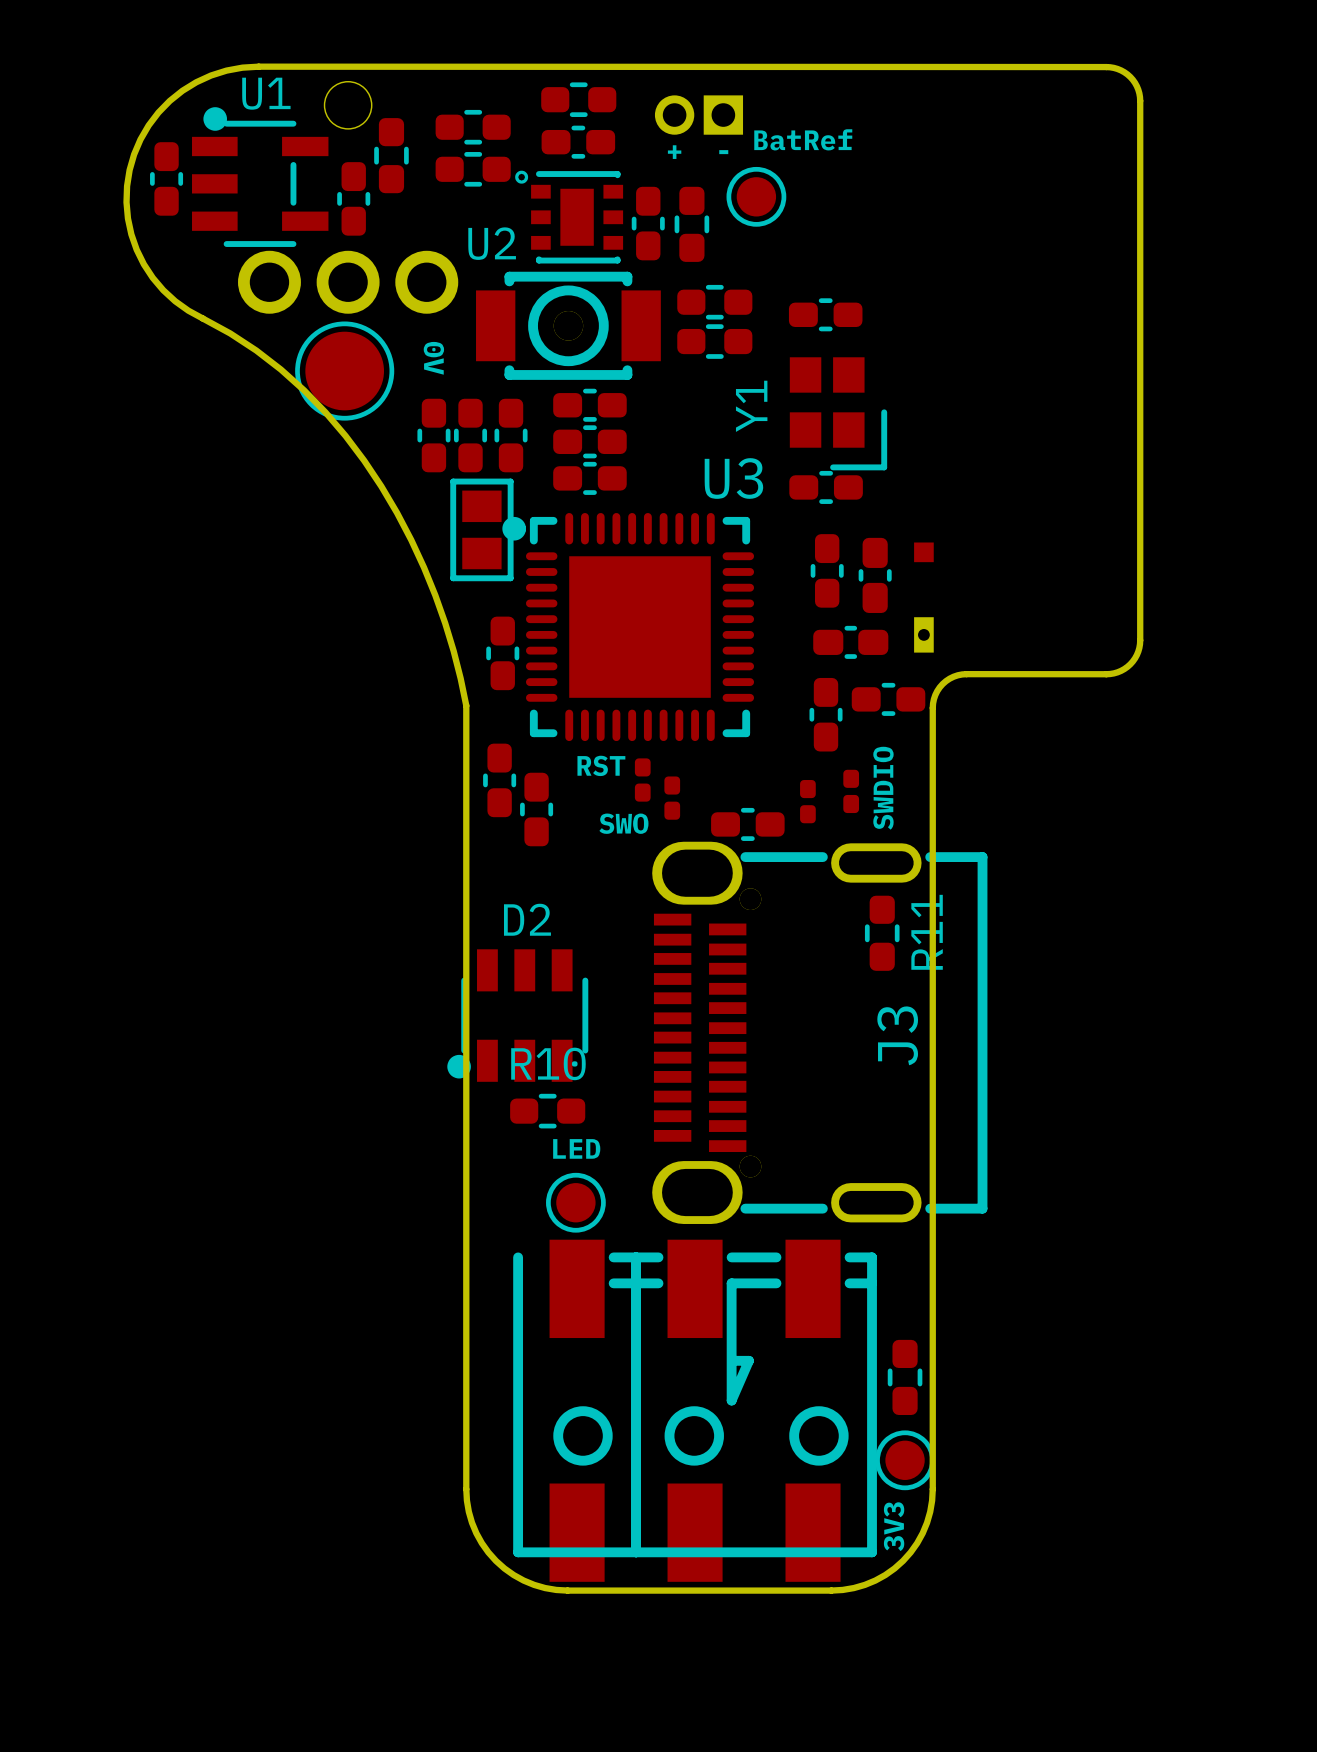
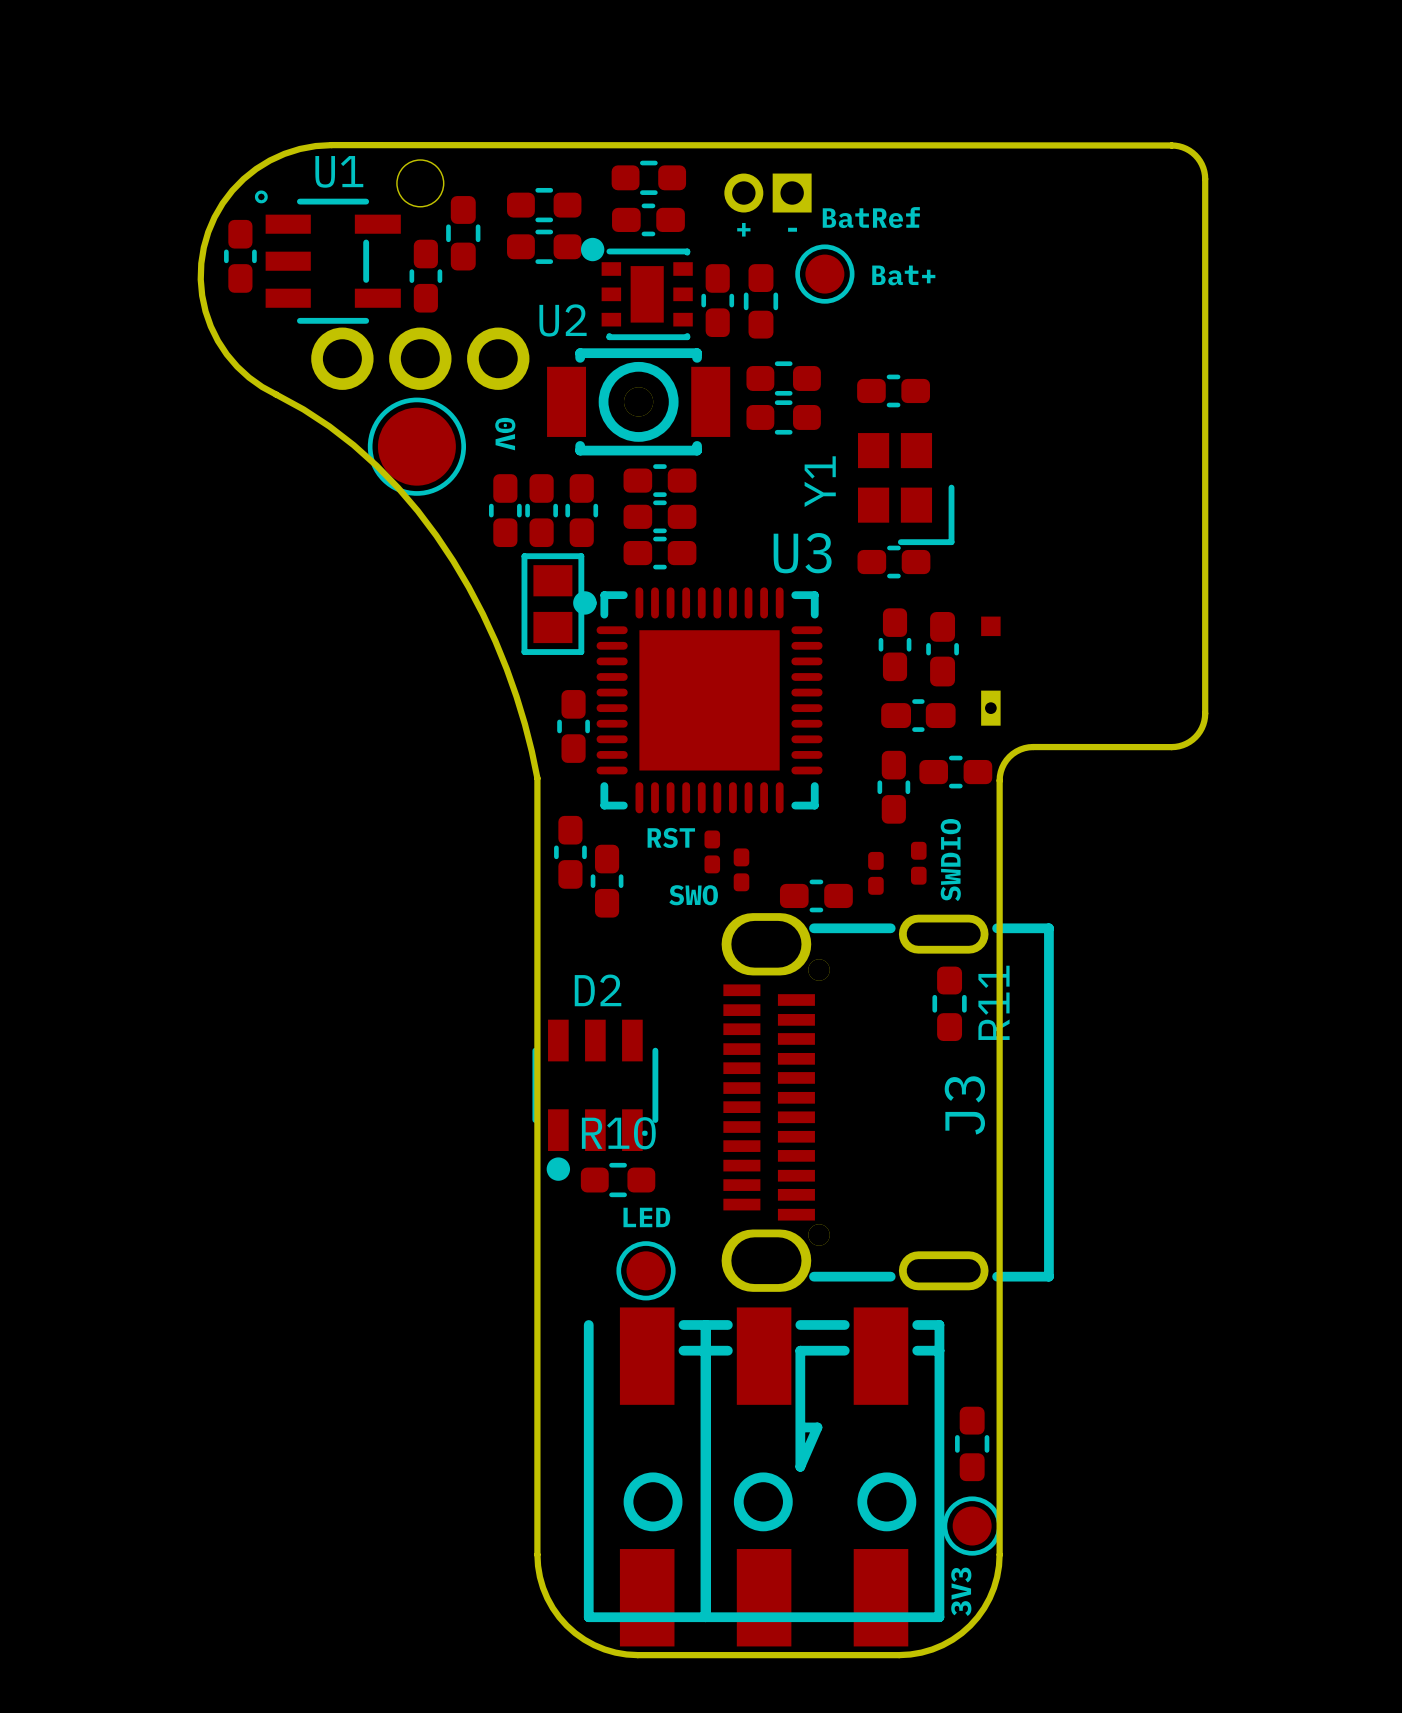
U1 footprint: [192, 107, 329, 247] -> [254, 190, 401, 324]
U2 footprint: [515, 170, 624, 264] -> [580, 237, 693, 341]
text: none -> Bat+ (903, 275)
D2 footprint: [447, 949, 589, 1082] -> [532, 1019, 659, 1181]

